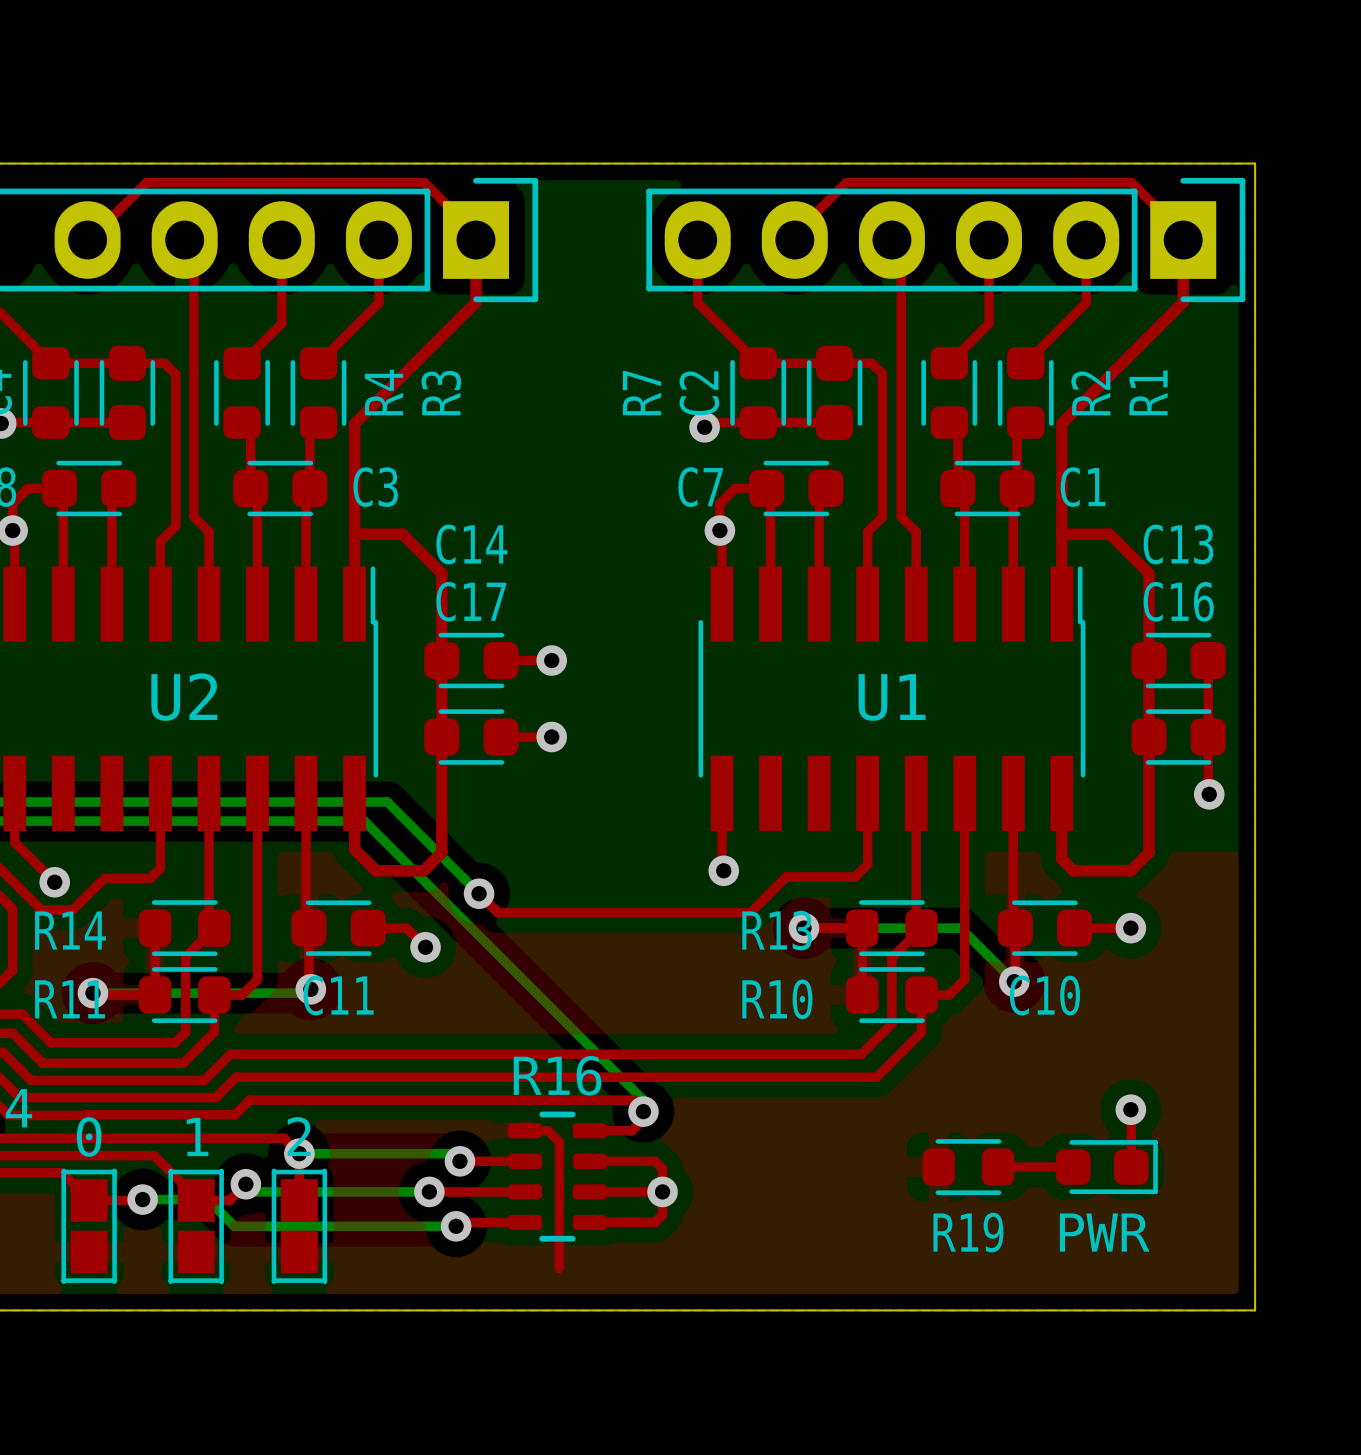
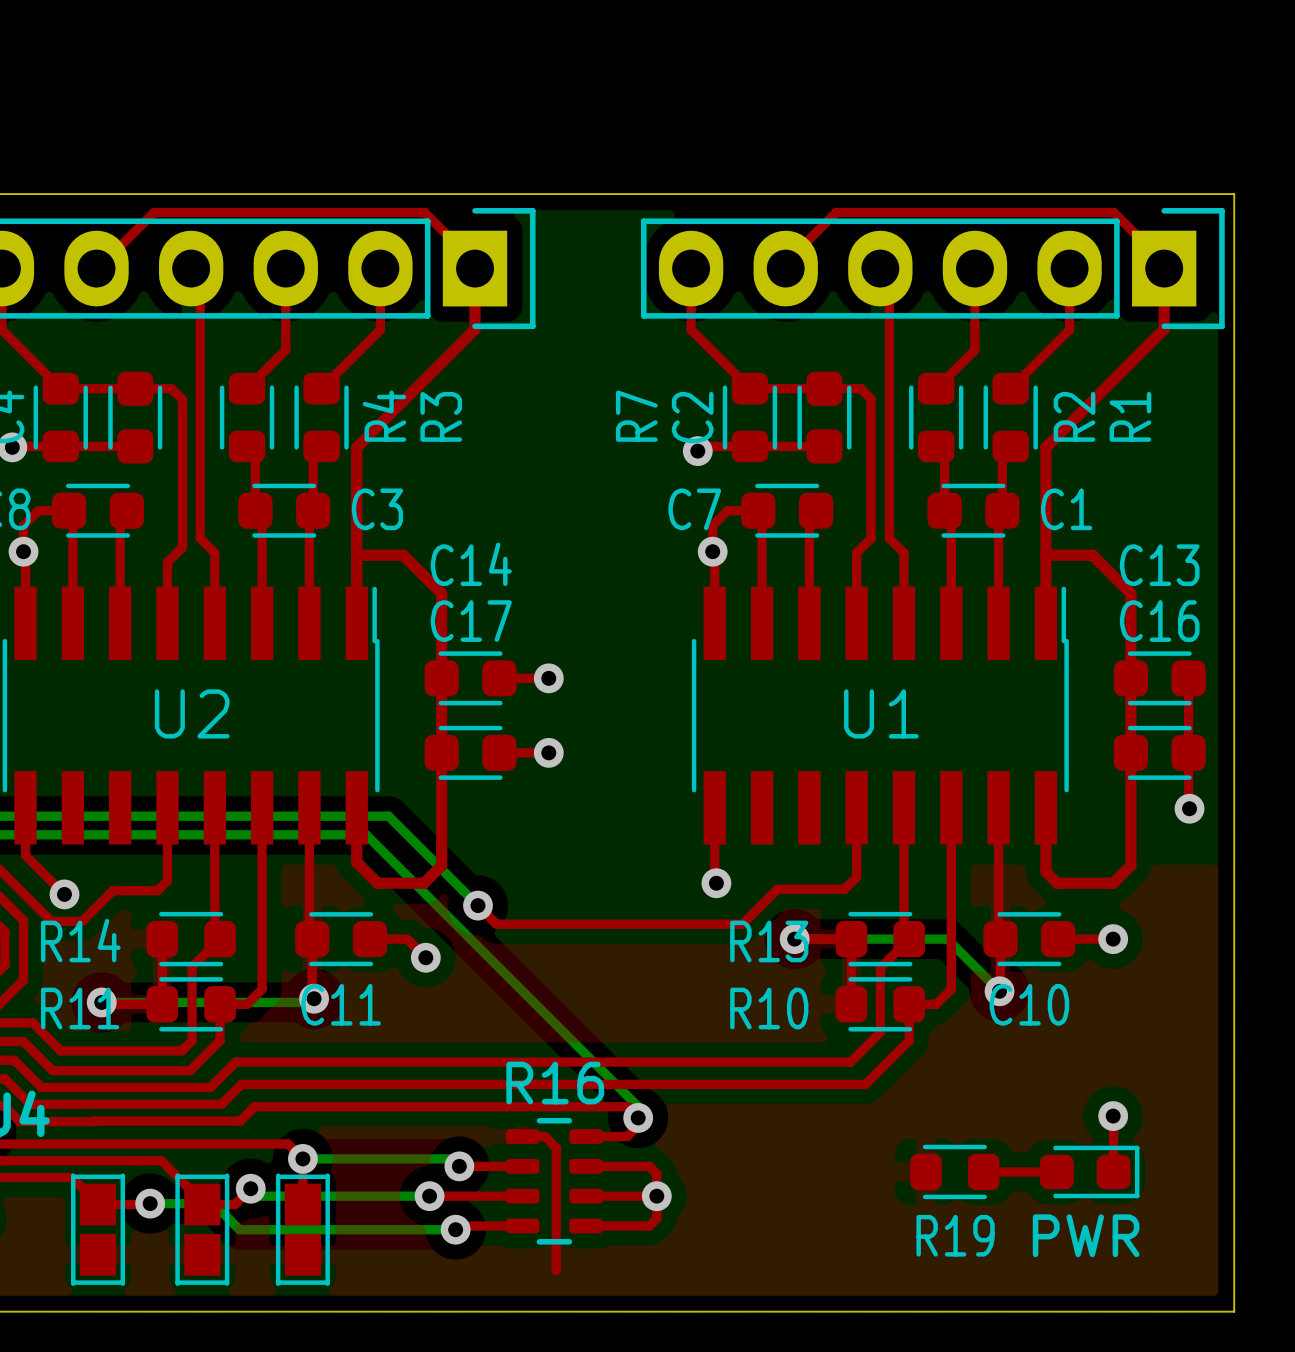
text: 0 (89, 1136) -> none
text: 1 (197, 1136) -> none
text: 2 (299, 1136) -> none

